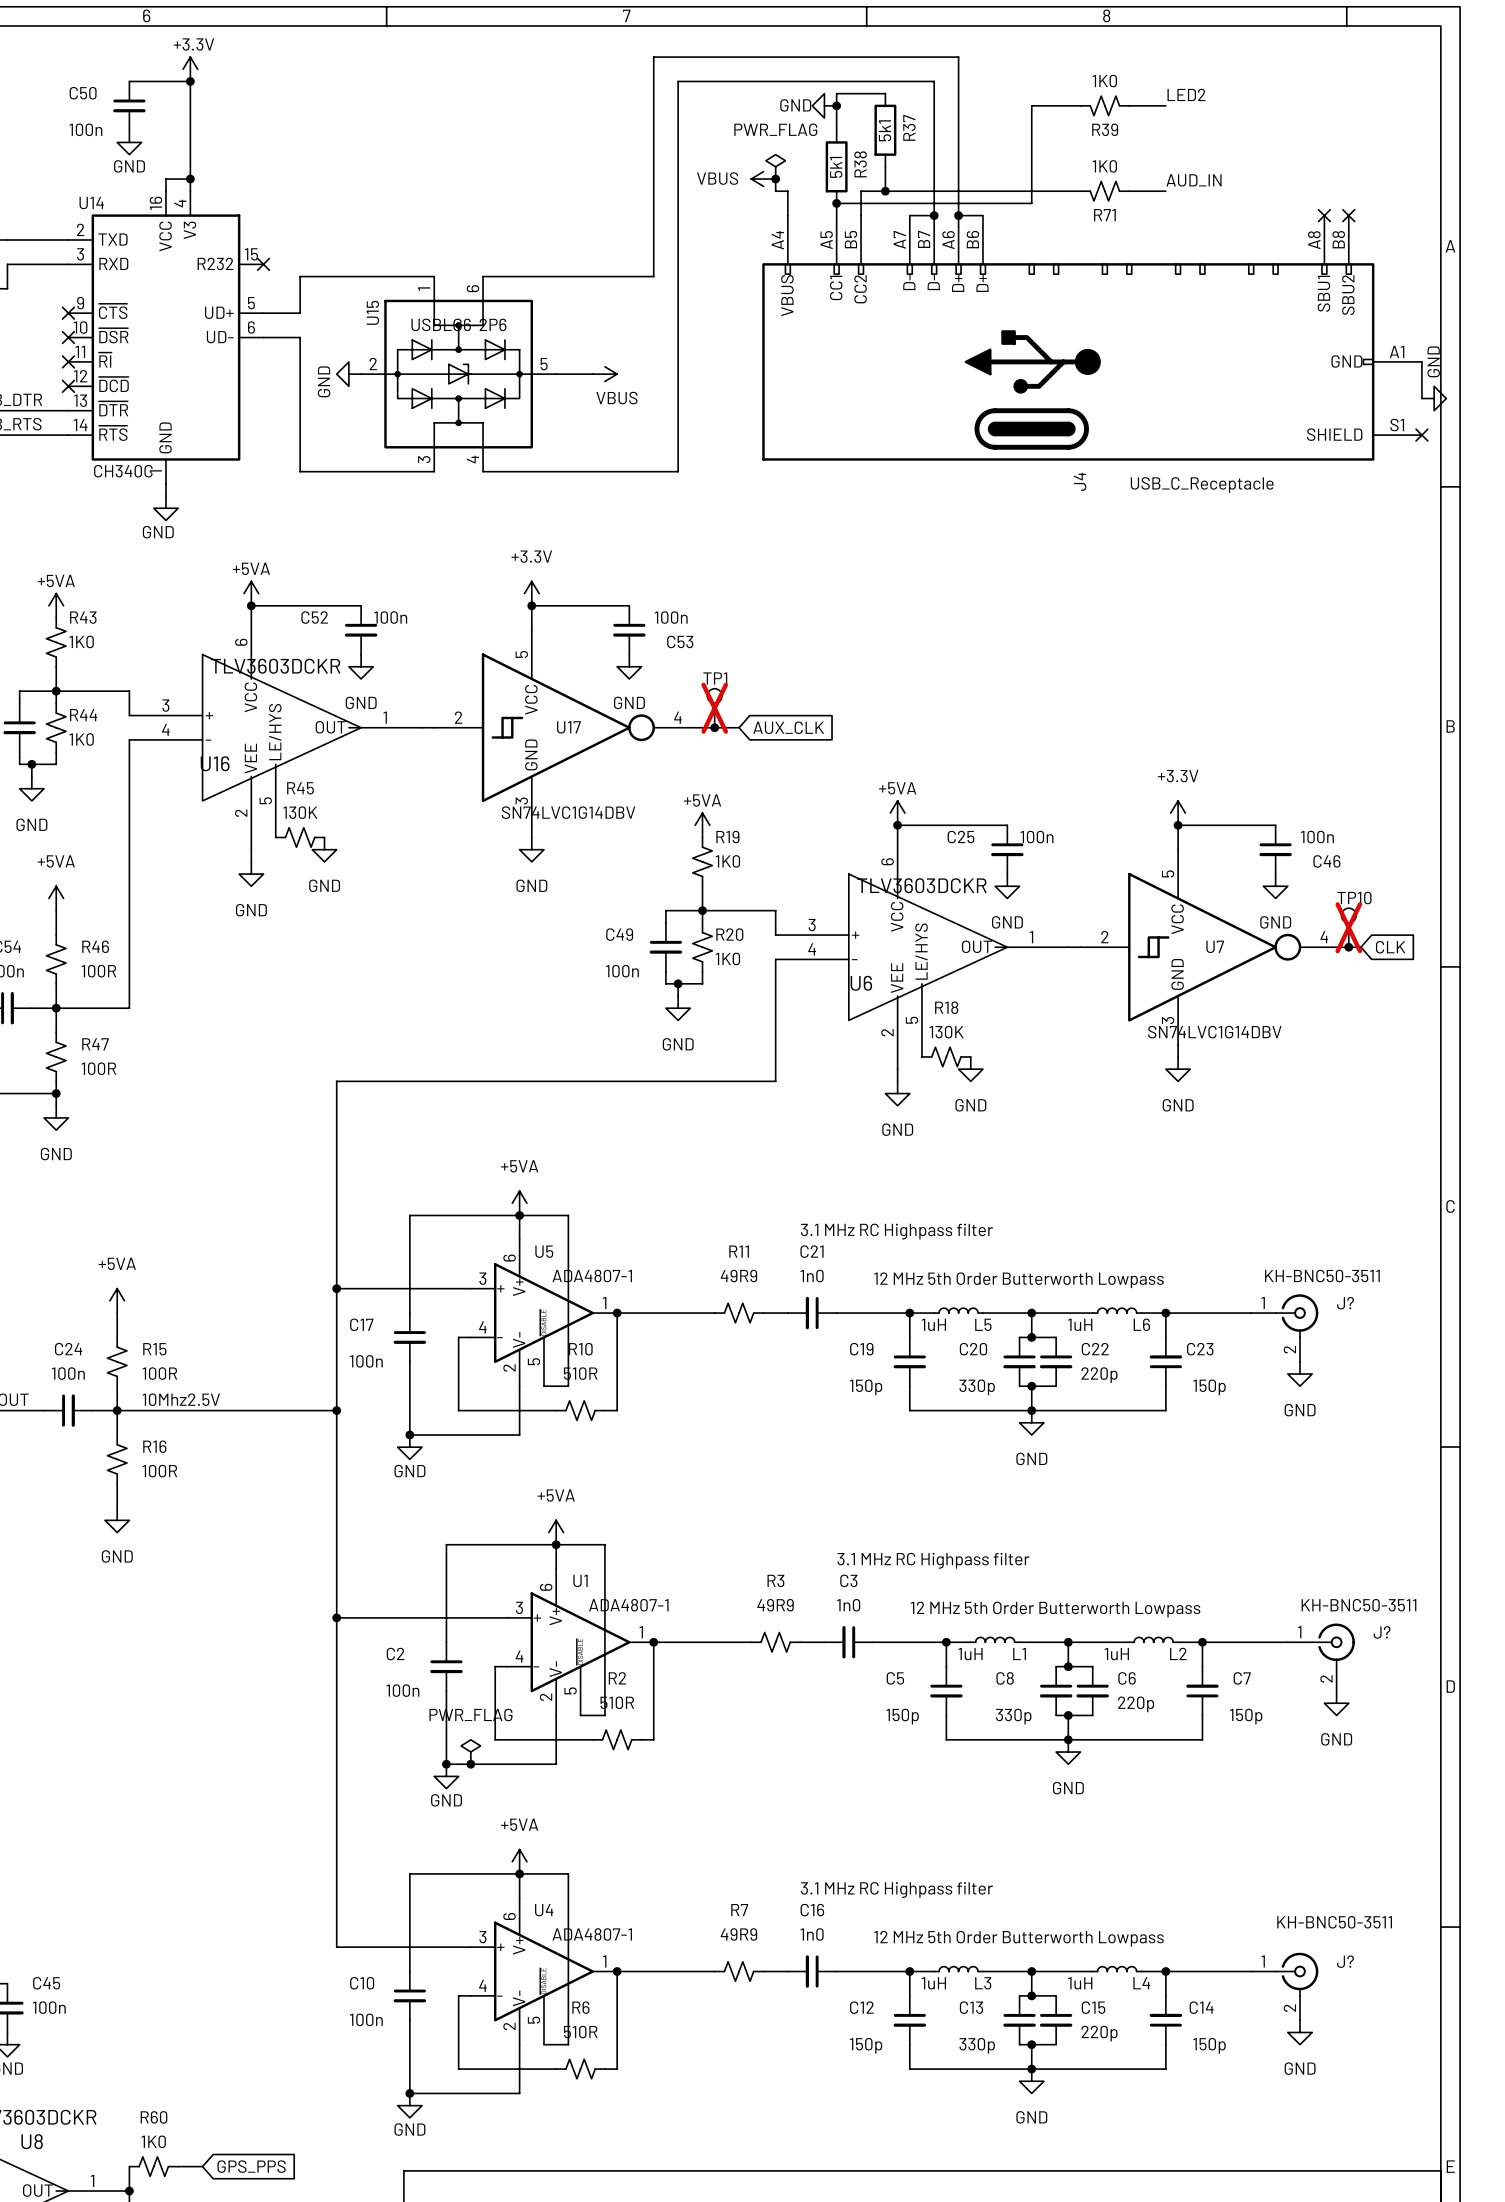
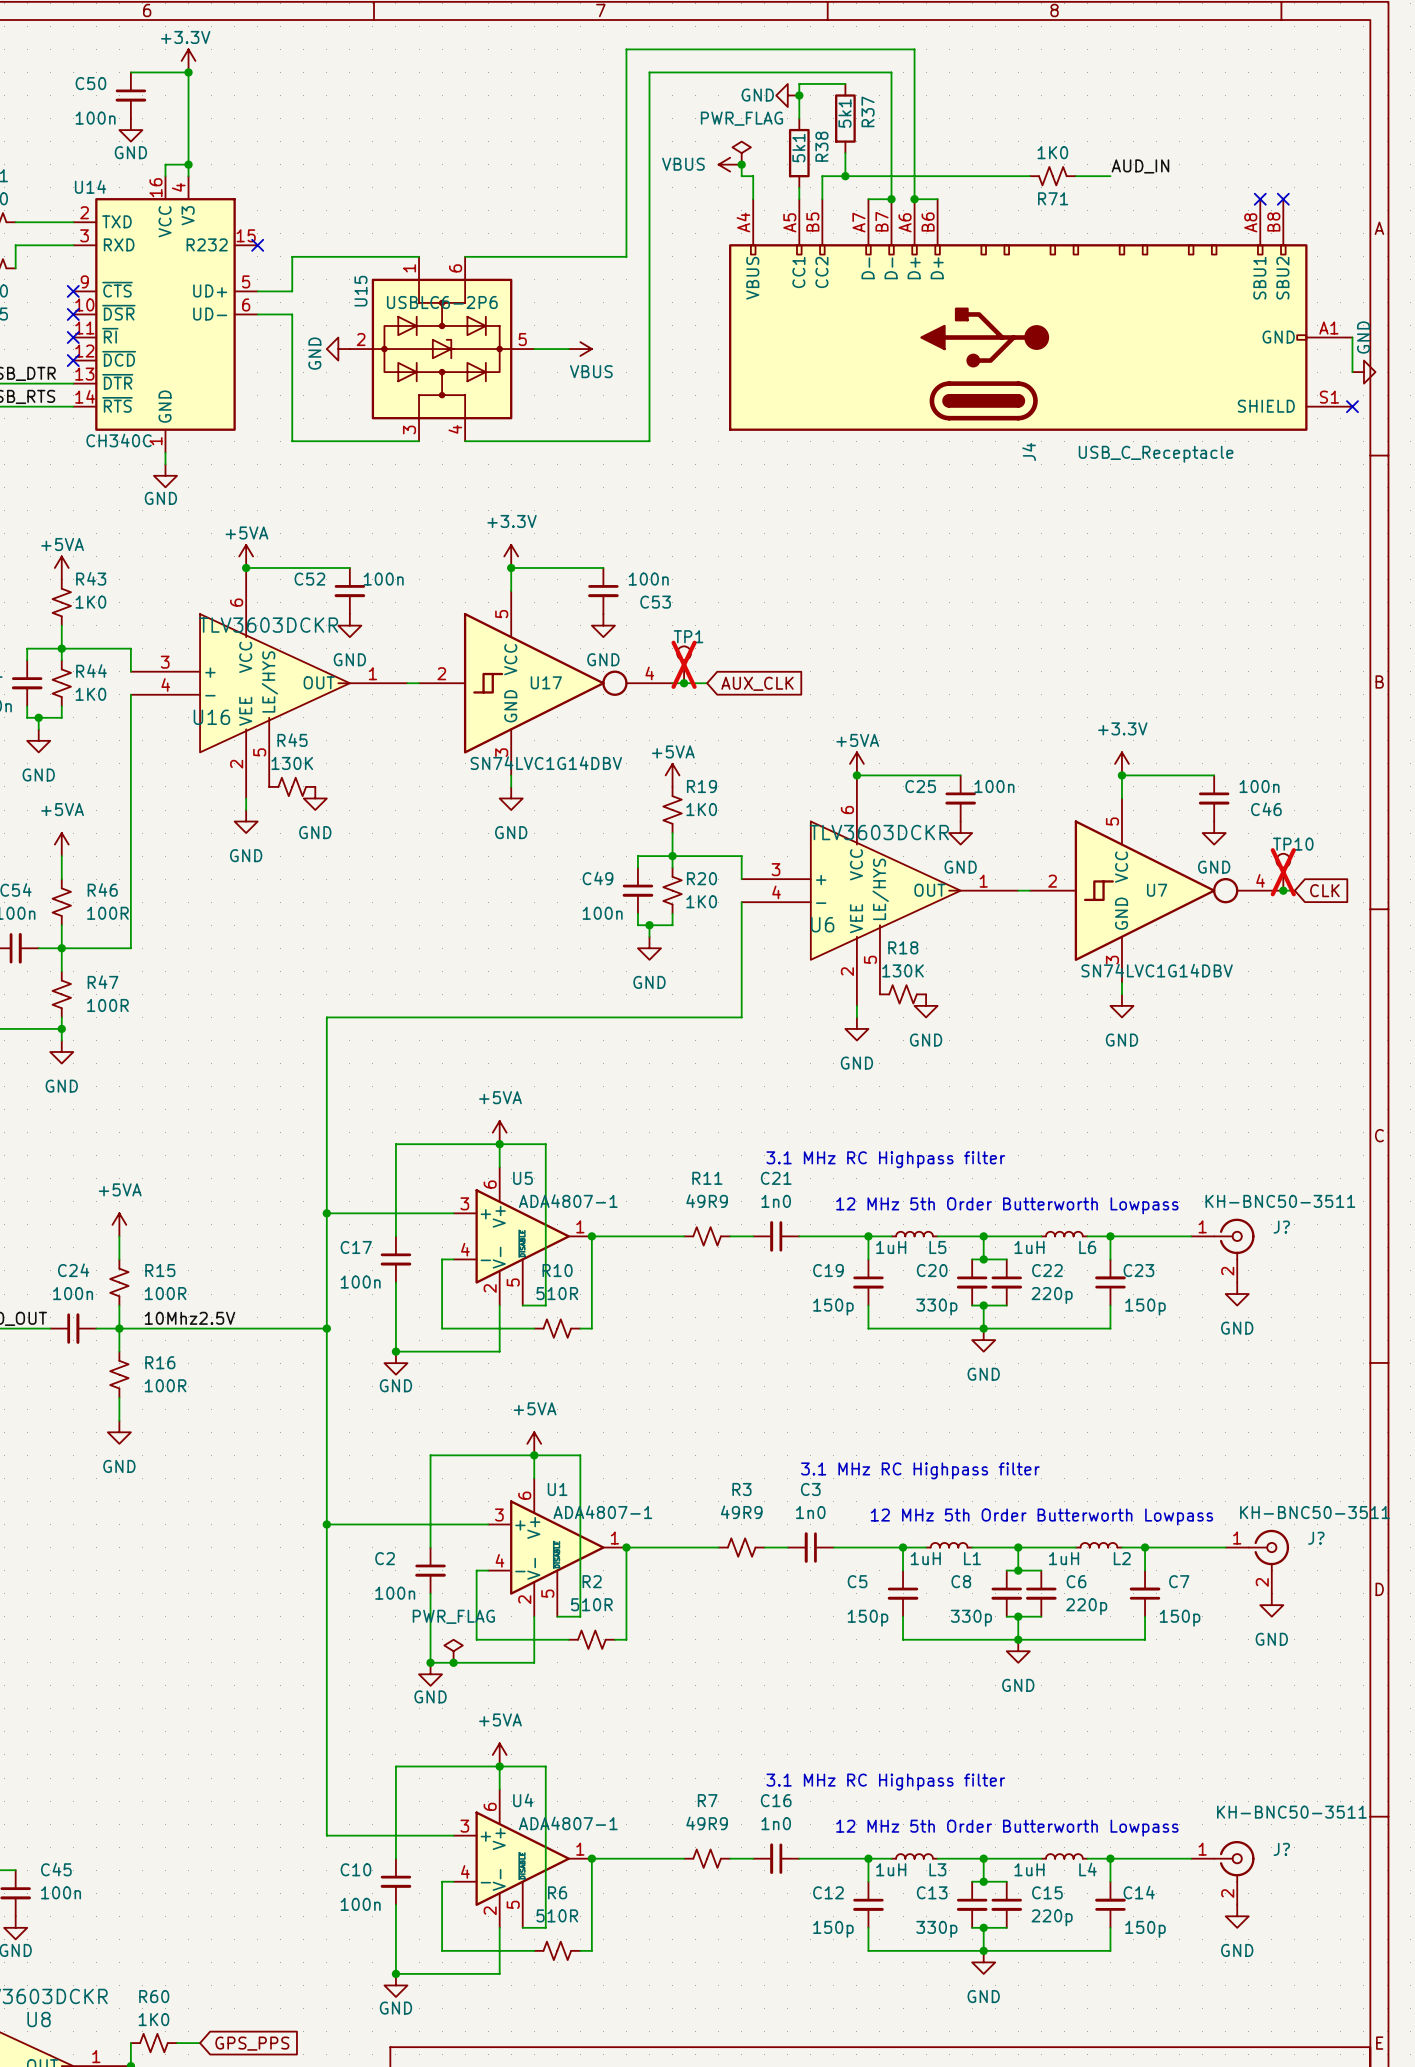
label: LED2 (1186, 94) -> none
wire: (1080, 105) (1031, 105) (1031, 203) (836, 203) -> none
R39: 1K0 (1104, 105) -> none
wire: (1129, 105) (1165, 105) -> none
junction: (836, 203) -> none

